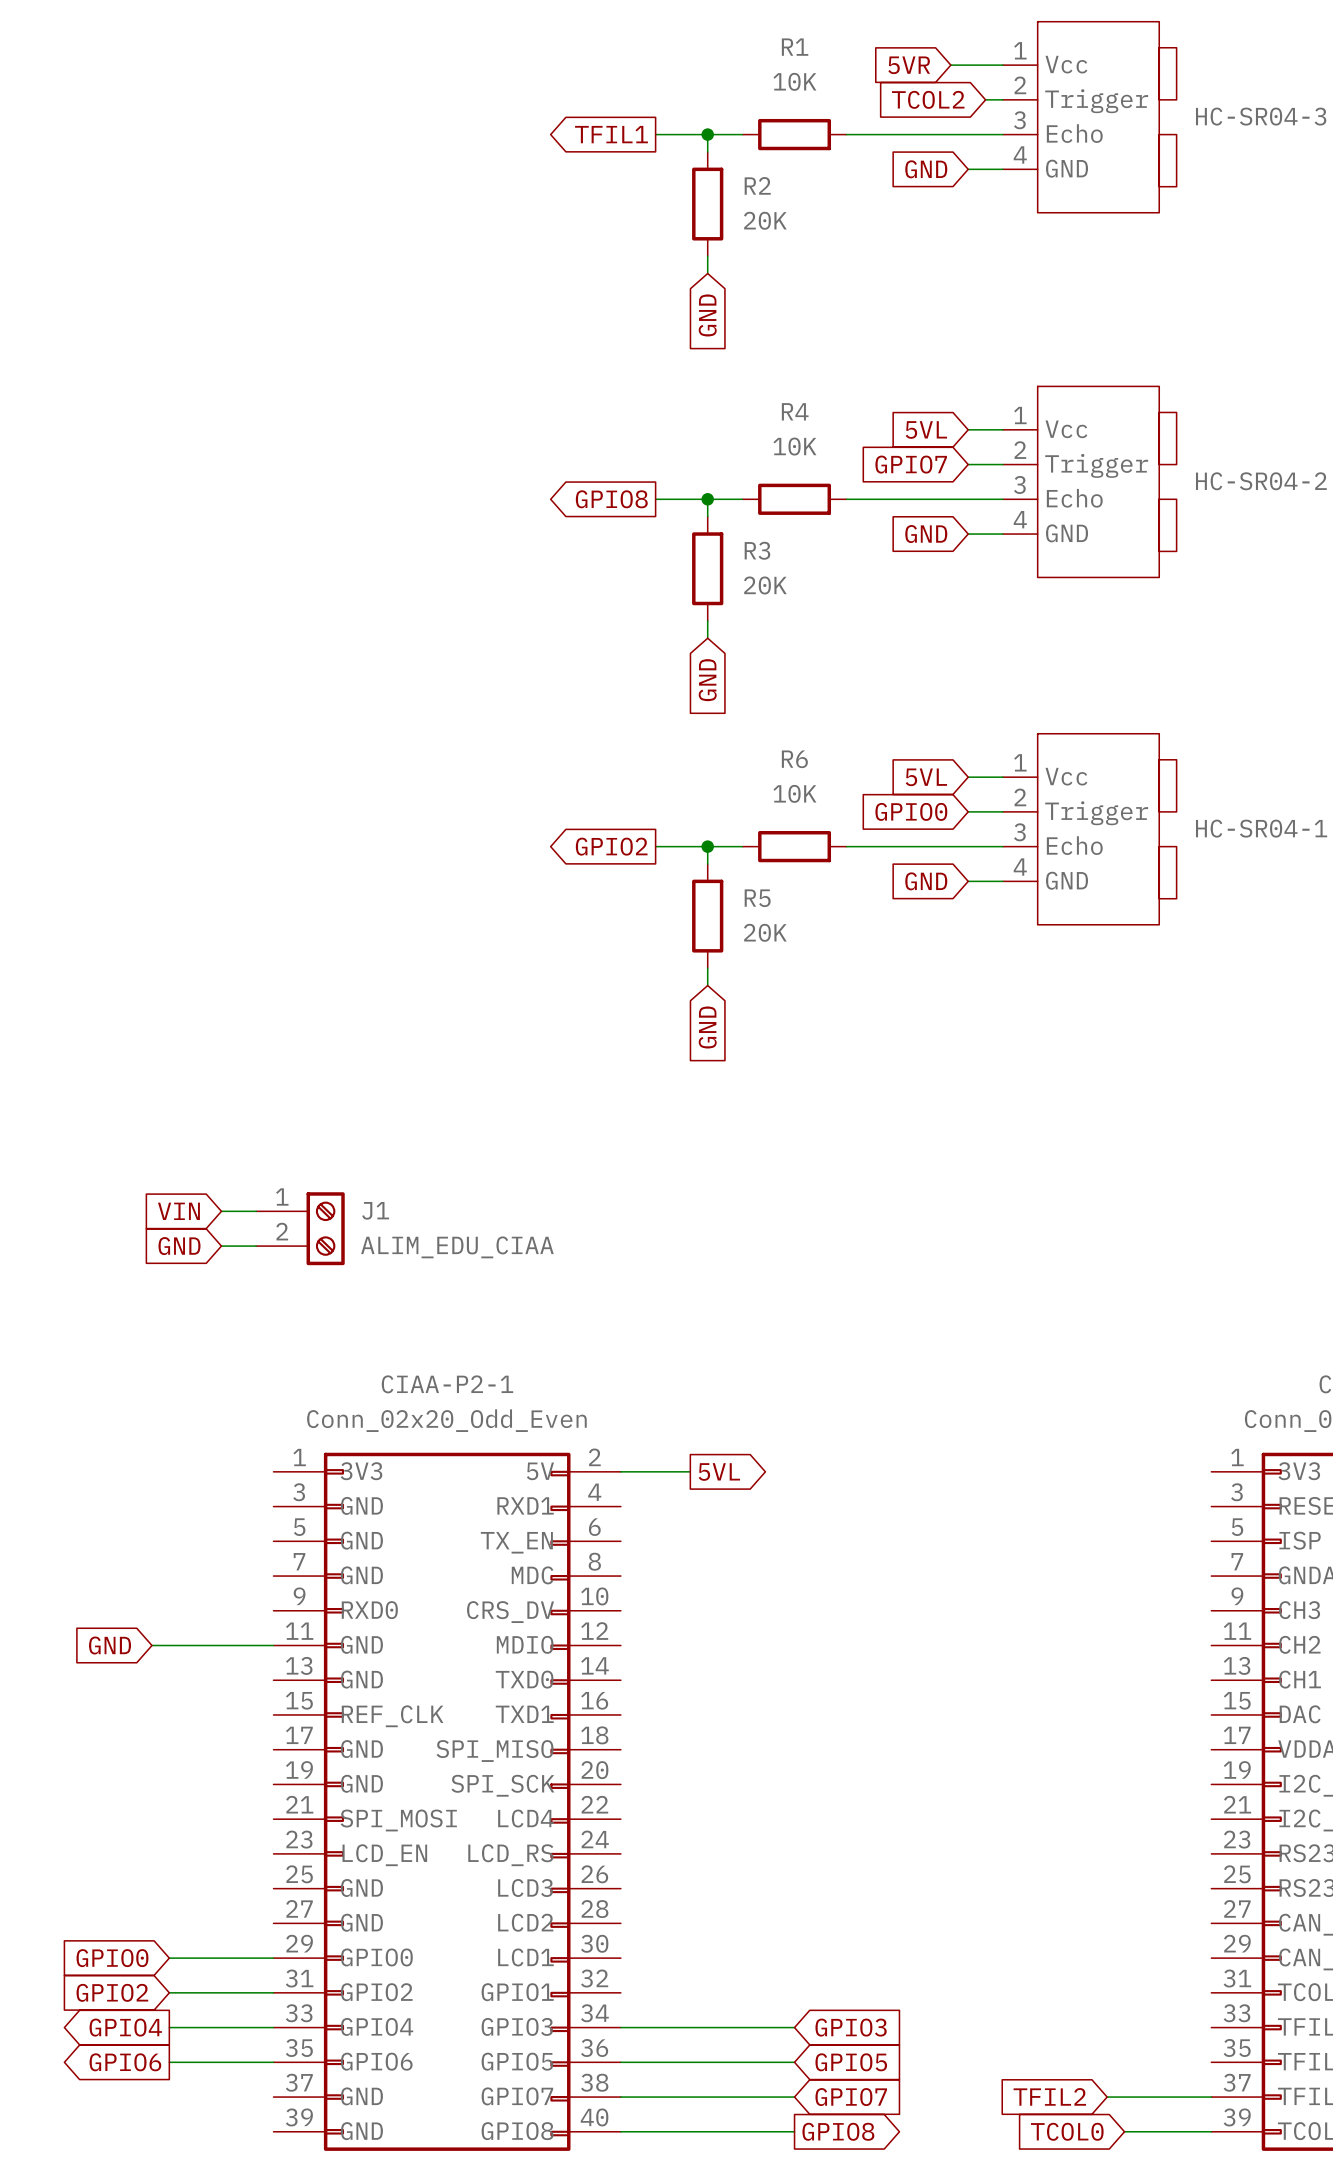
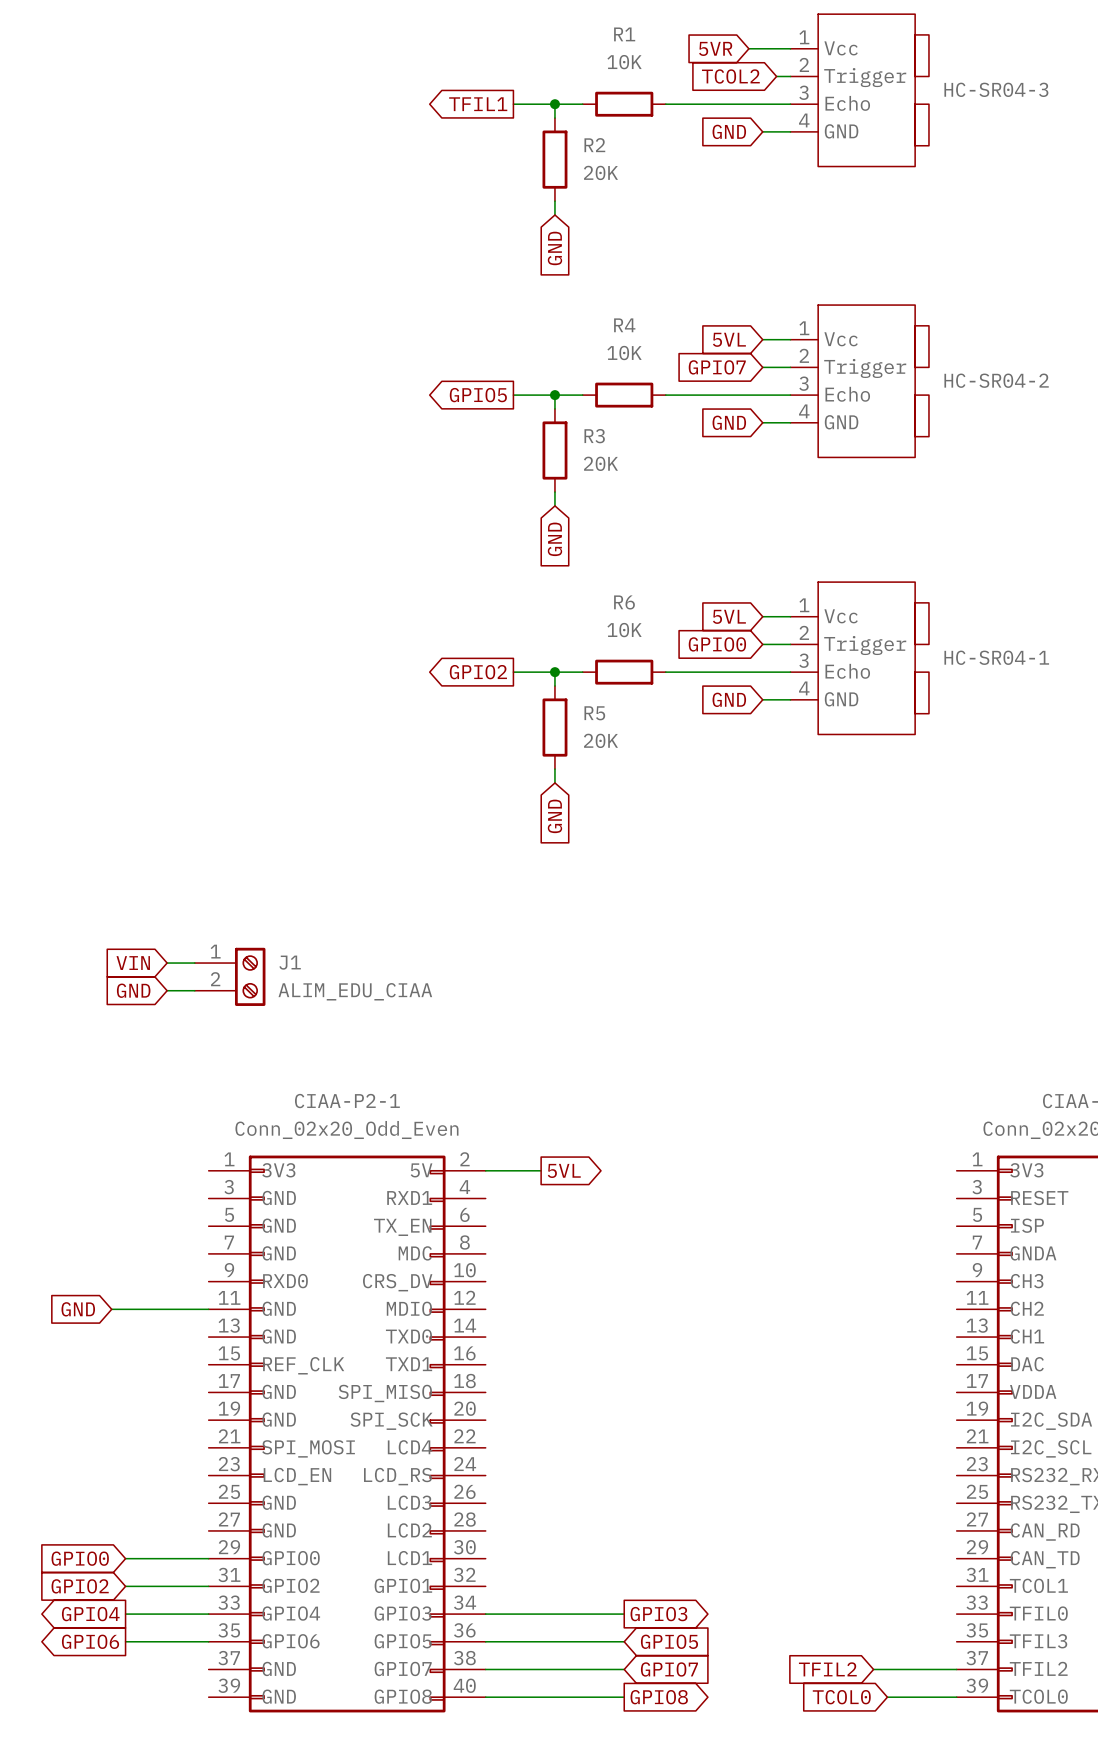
global label: GPIO8 (611, 499) -> GPIO5 (478, 395)
global label shape: input (851, 2027) -> output (658, 1614)

